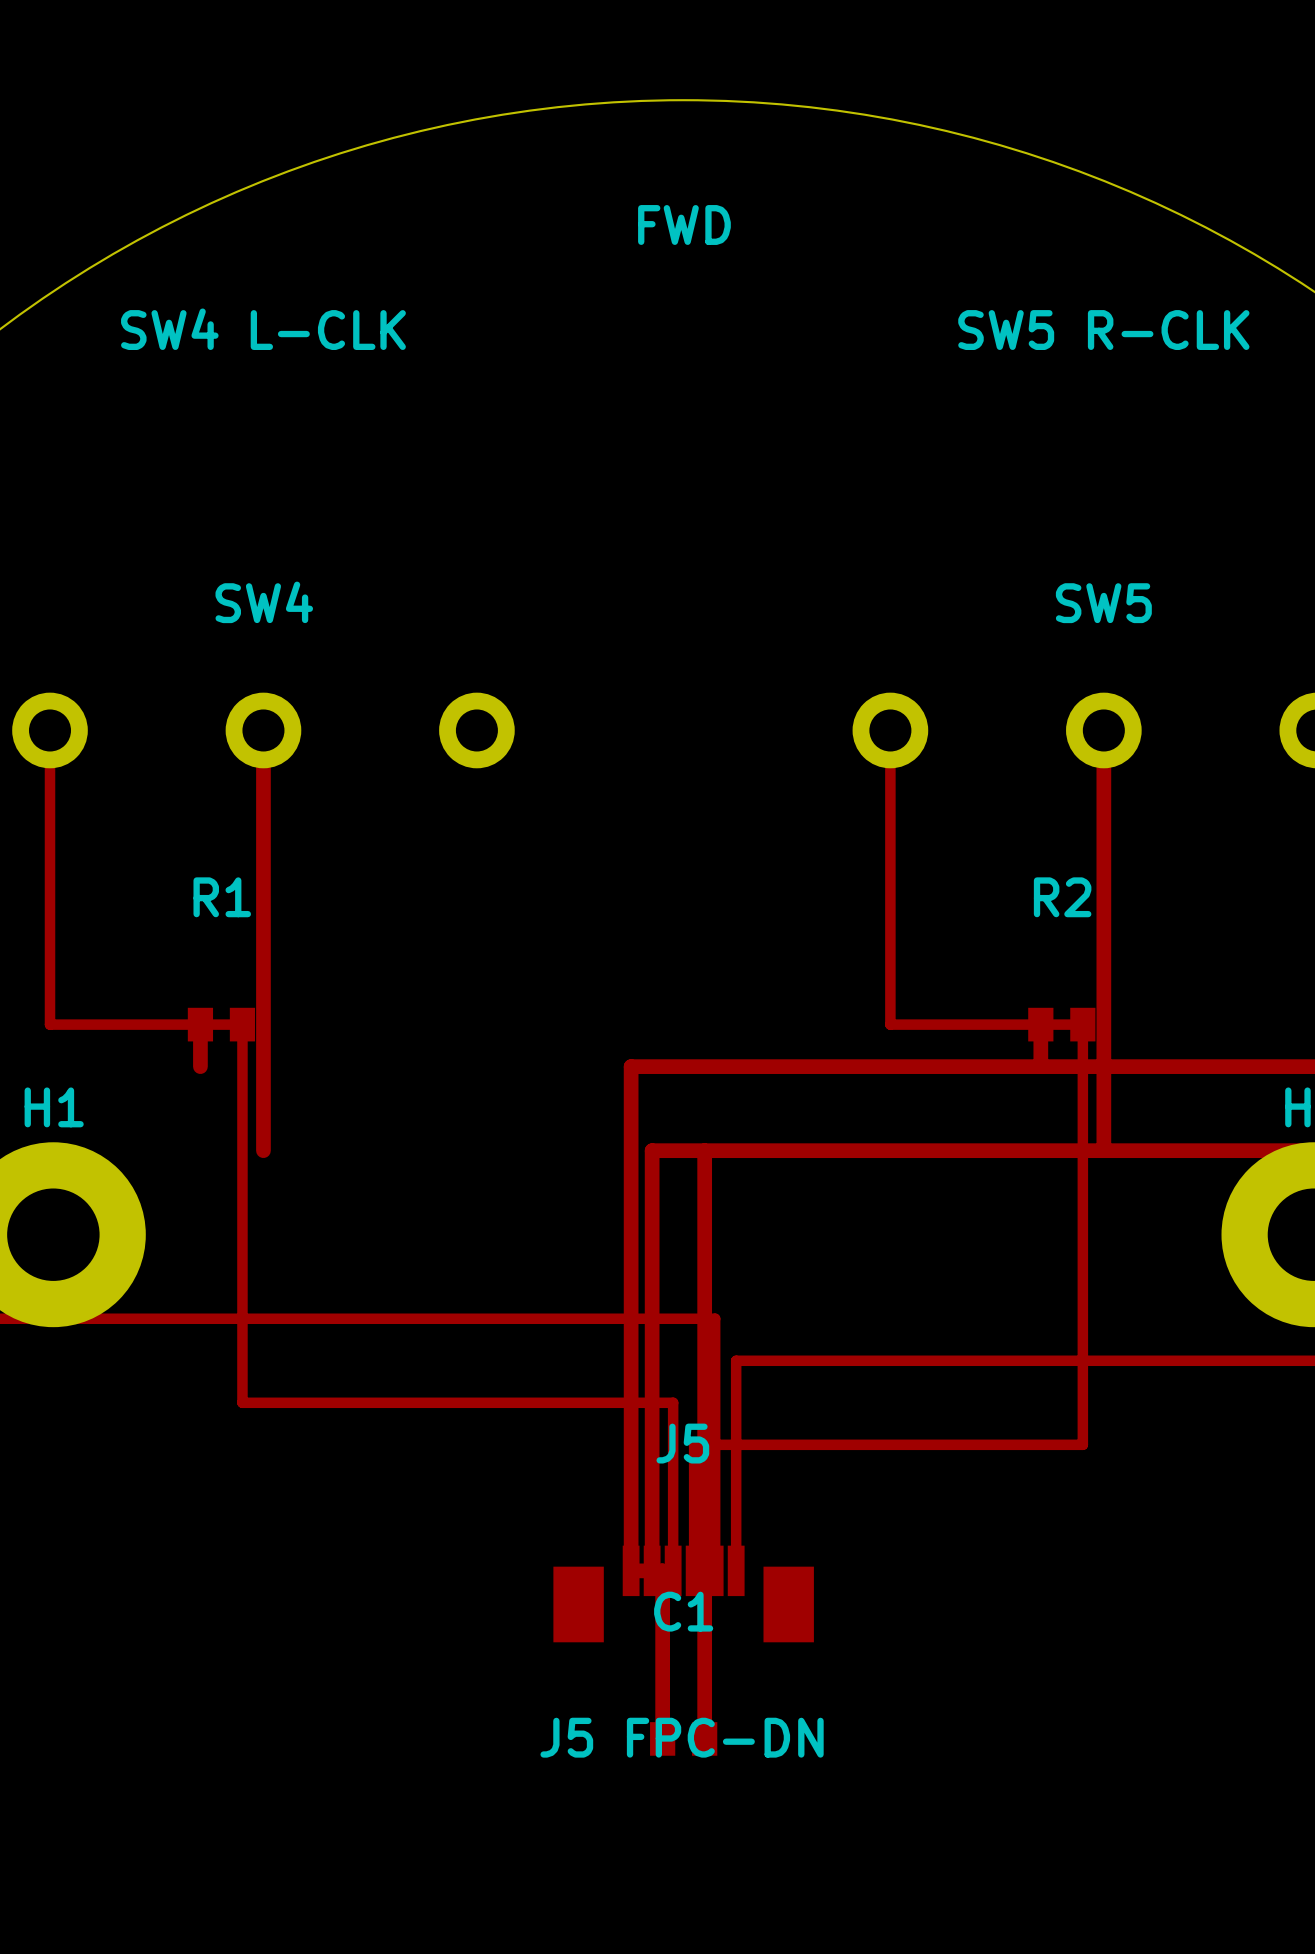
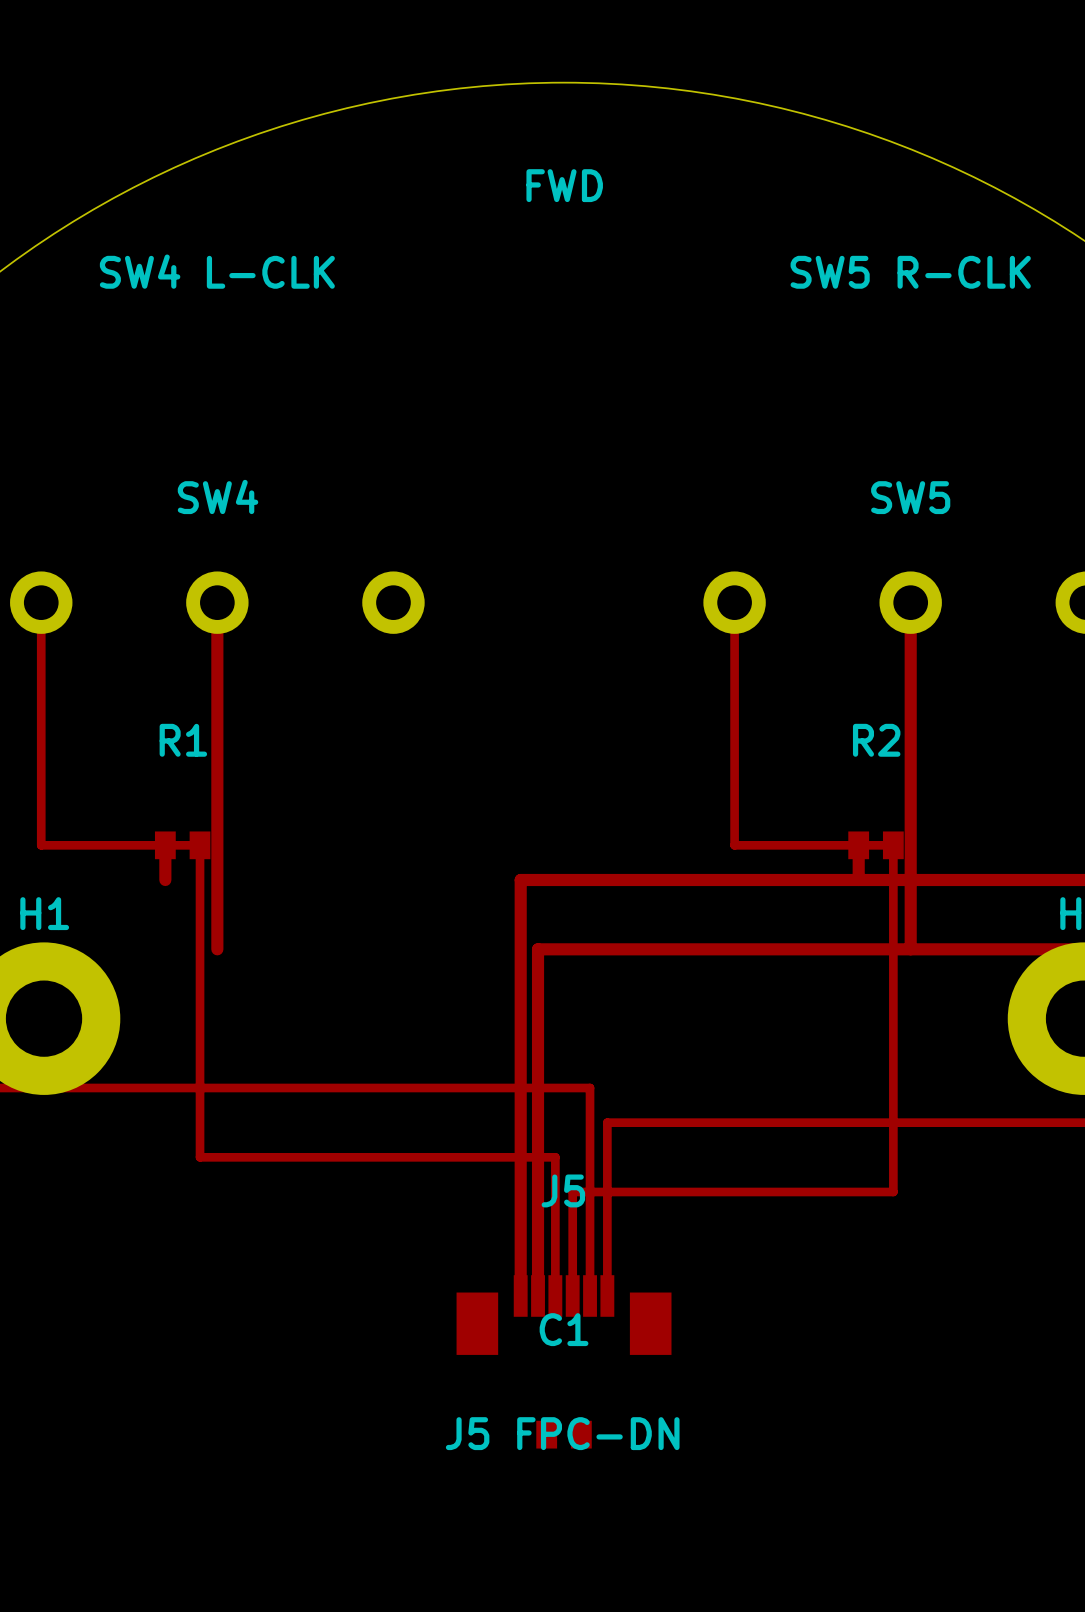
track: (704, 1150) (704, 1738) -> none
track: (631, 1570) (662, 1570) (662, 1738) -> none

